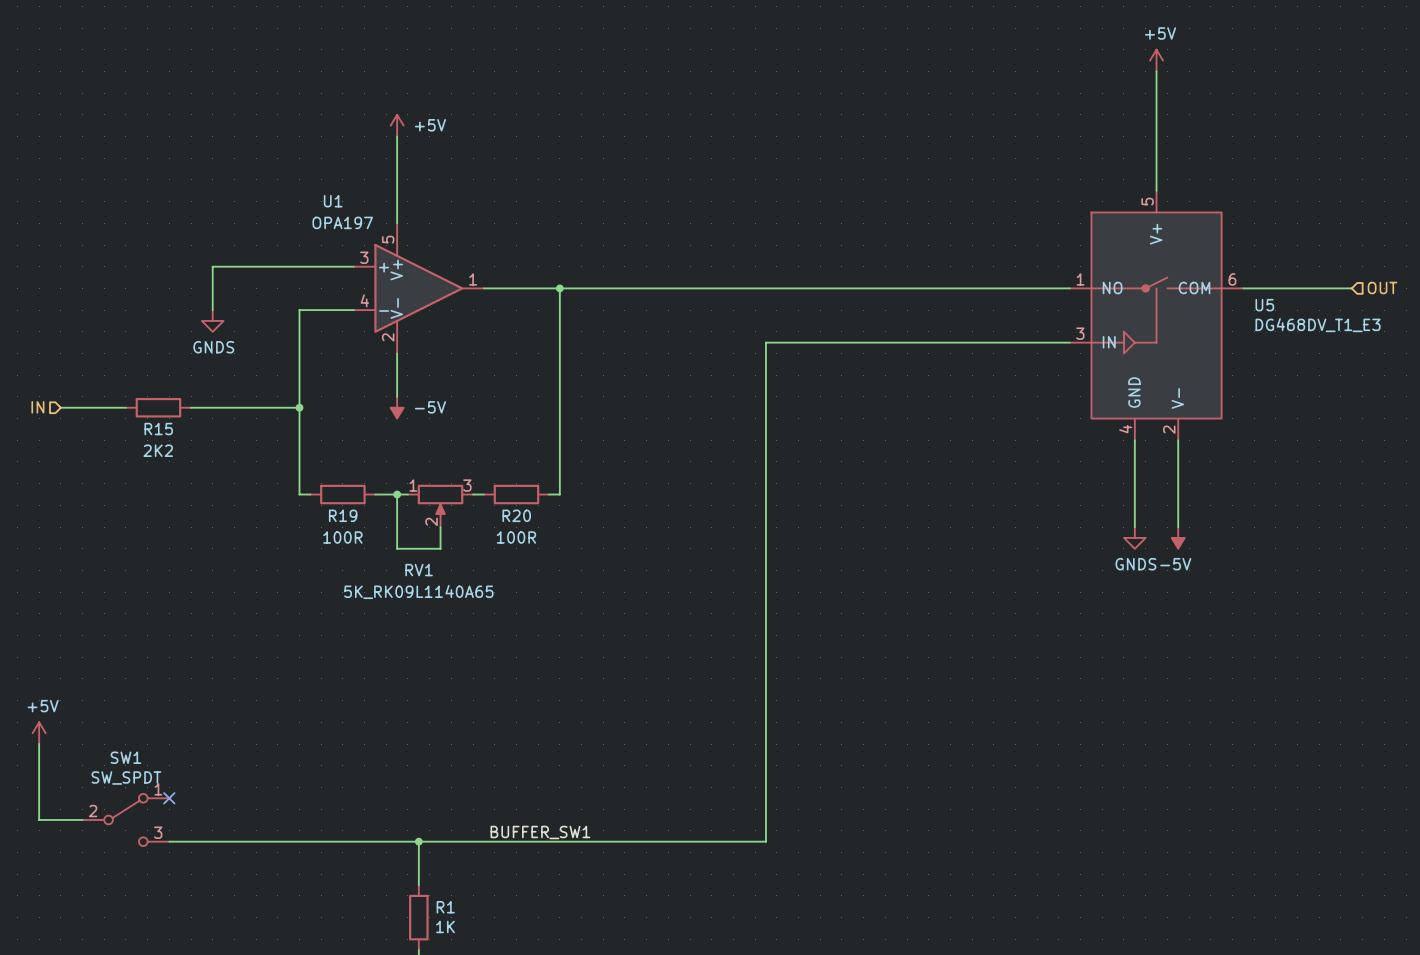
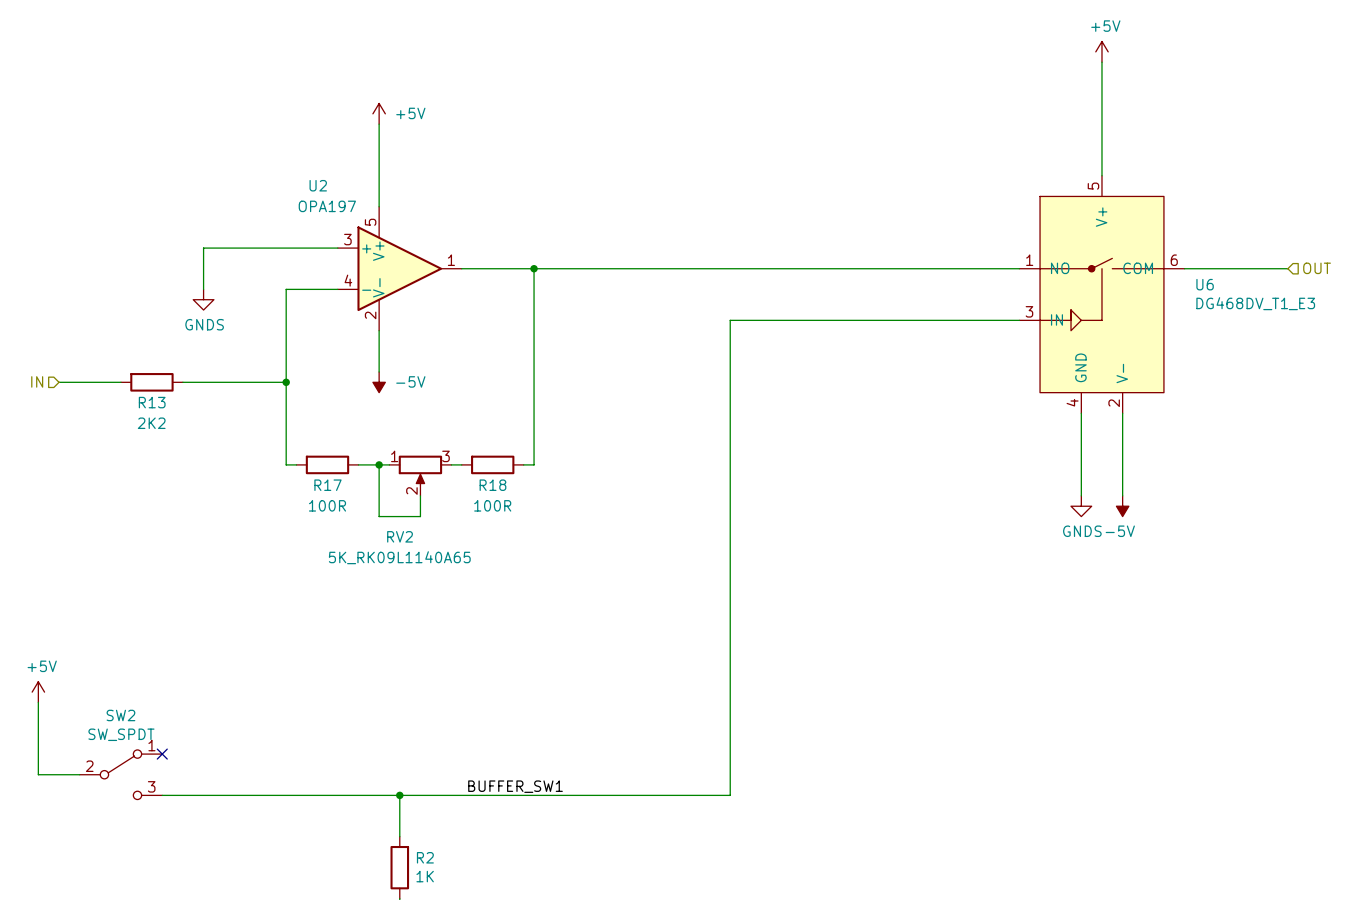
U1 name: U1 (333, 201) -> U2 (318, 185)
U5 name: U5 (1264, 305) -> U6 (1205, 284)
R15 name: R15 (158, 429) -> R13 (152, 402)
R19 name: R19 (343, 515) -> R17 (327, 485)
R20 name: R20 (516, 515) -> R18 (492, 485)
RV1 name: RV1 (419, 570) -> RV2 (400, 536)
SW1 name: SW1 (125, 757) -> SW2 (120, 715)
R1 name: R1 (445, 907) -> R2 (425, 857)

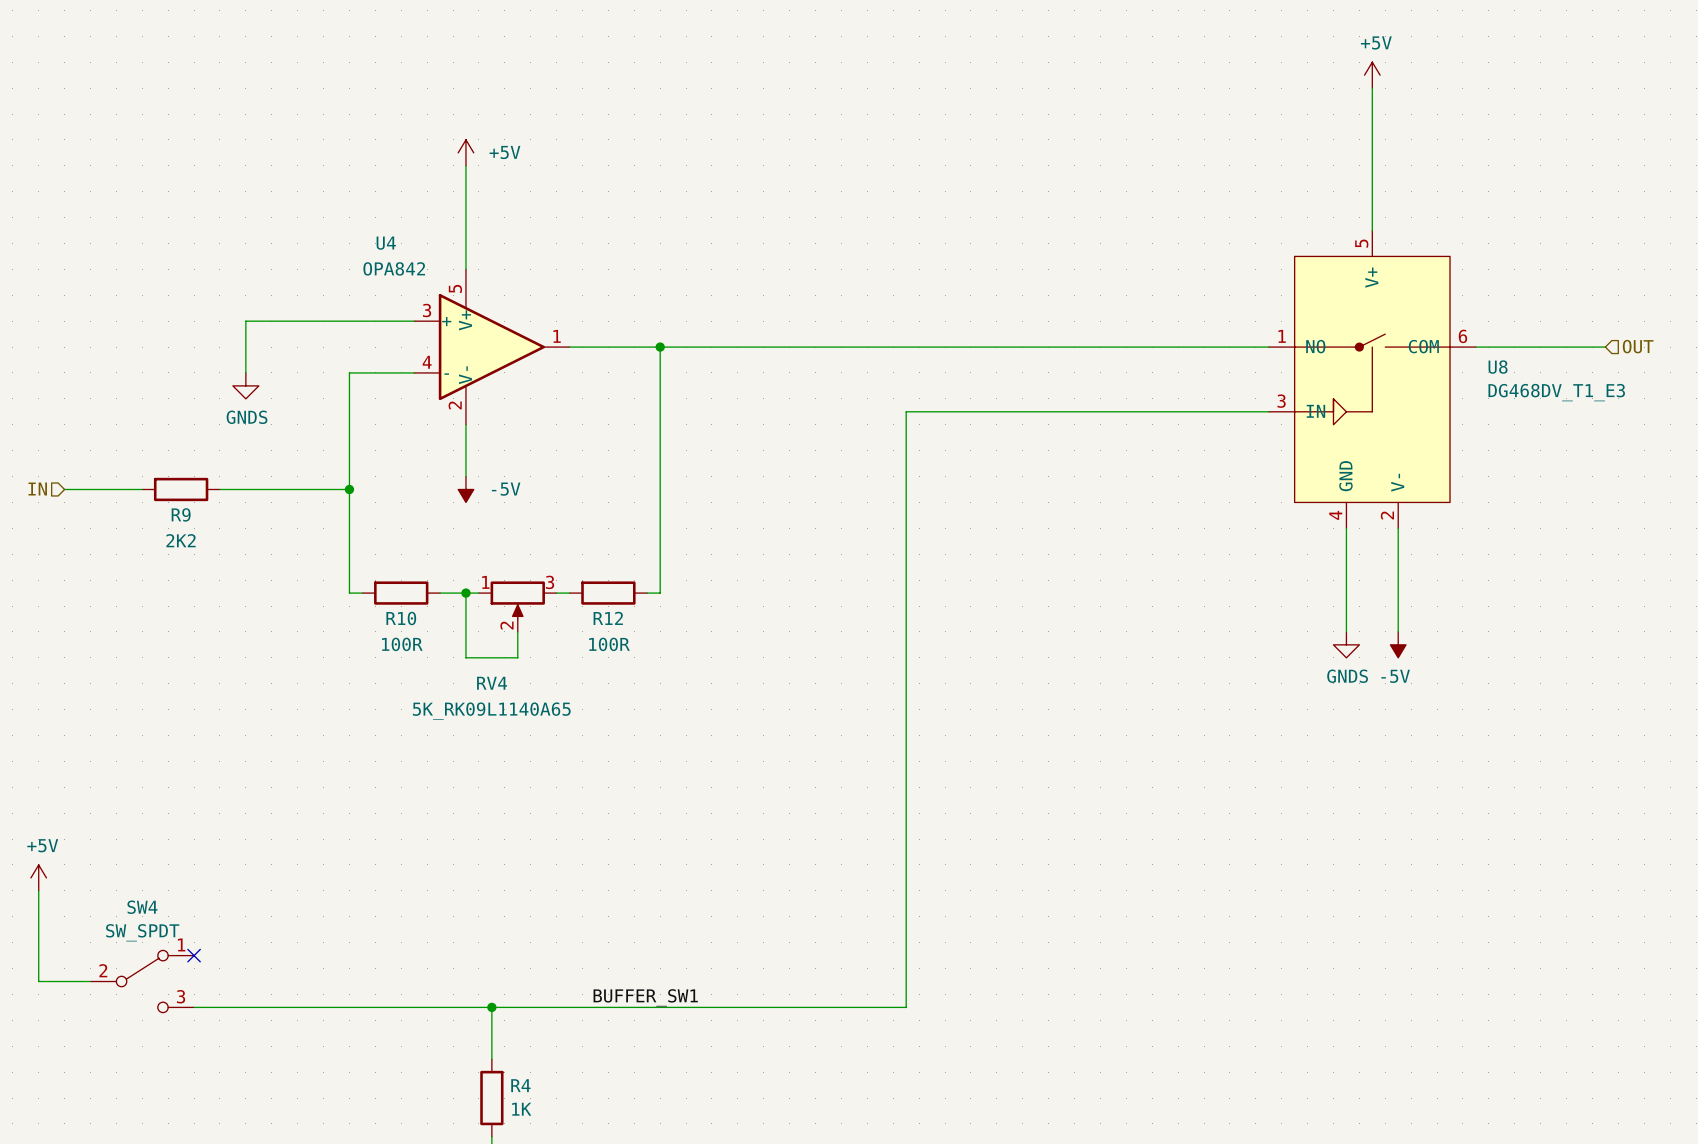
U2 name: U2 (318, 185) -> U4 (386, 243)
U2 value: OPA197 (327, 206) -> OPA842 (394, 268)
U6 name: U6 (1205, 284) -> U8 (1498, 367)
R13 name: R13 (152, 402) -> R9 (181, 514)
R17 name: R17 (327, 485) -> R10 (401, 618)
R18 name: R18 (492, 485) -> R12 (608, 618)
RV2 name: RV2 (400, 536) -> RV4 (492, 683)
SW2 name: SW2 (120, 715) -> SW4 (142, 907)
R2 name: R2 (425, 857) -> R4 (520, 1085)

